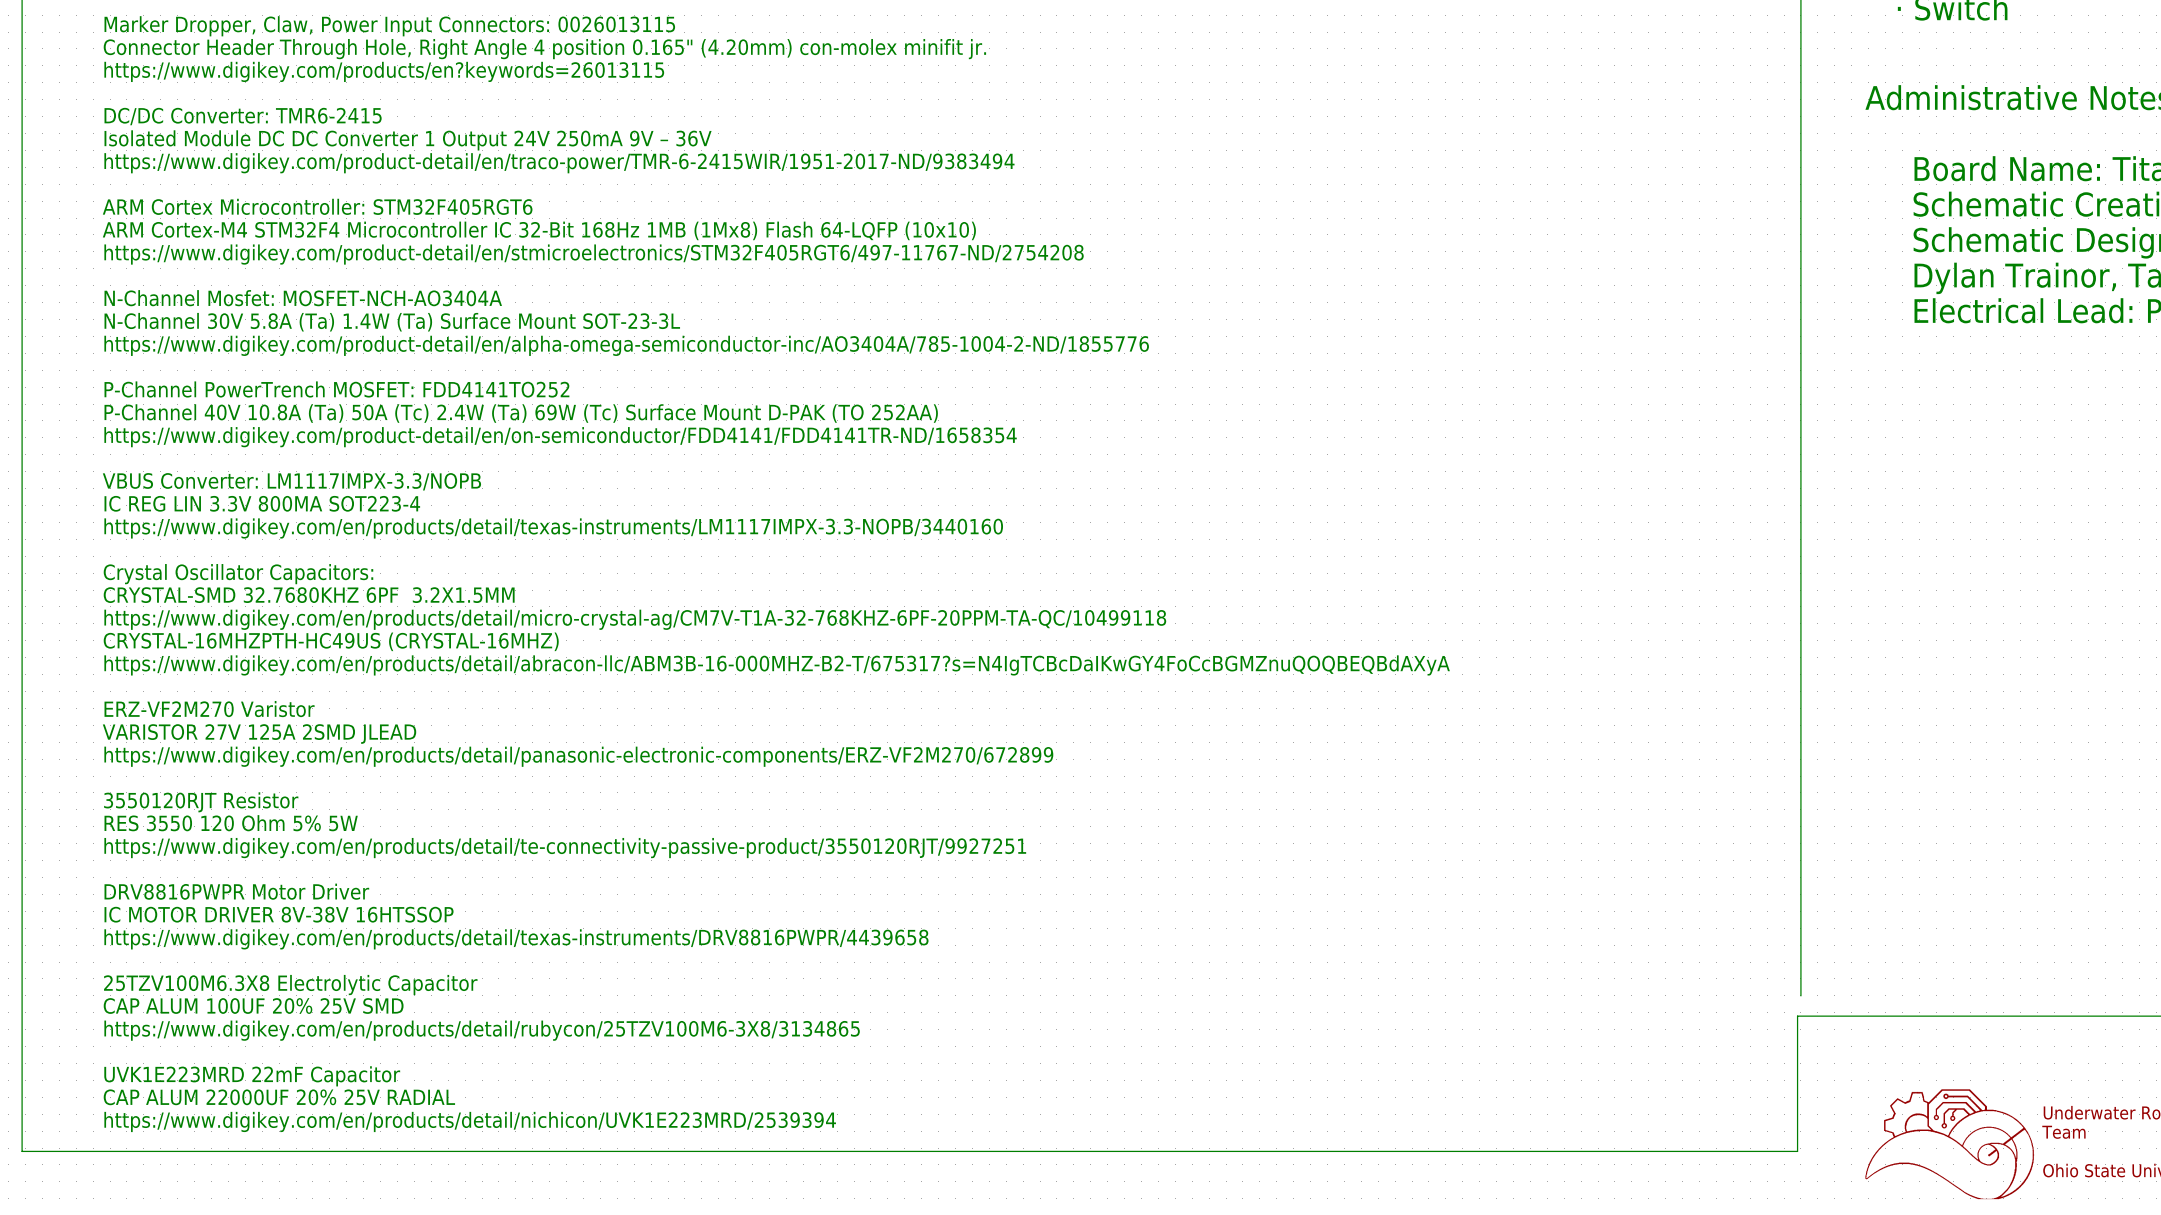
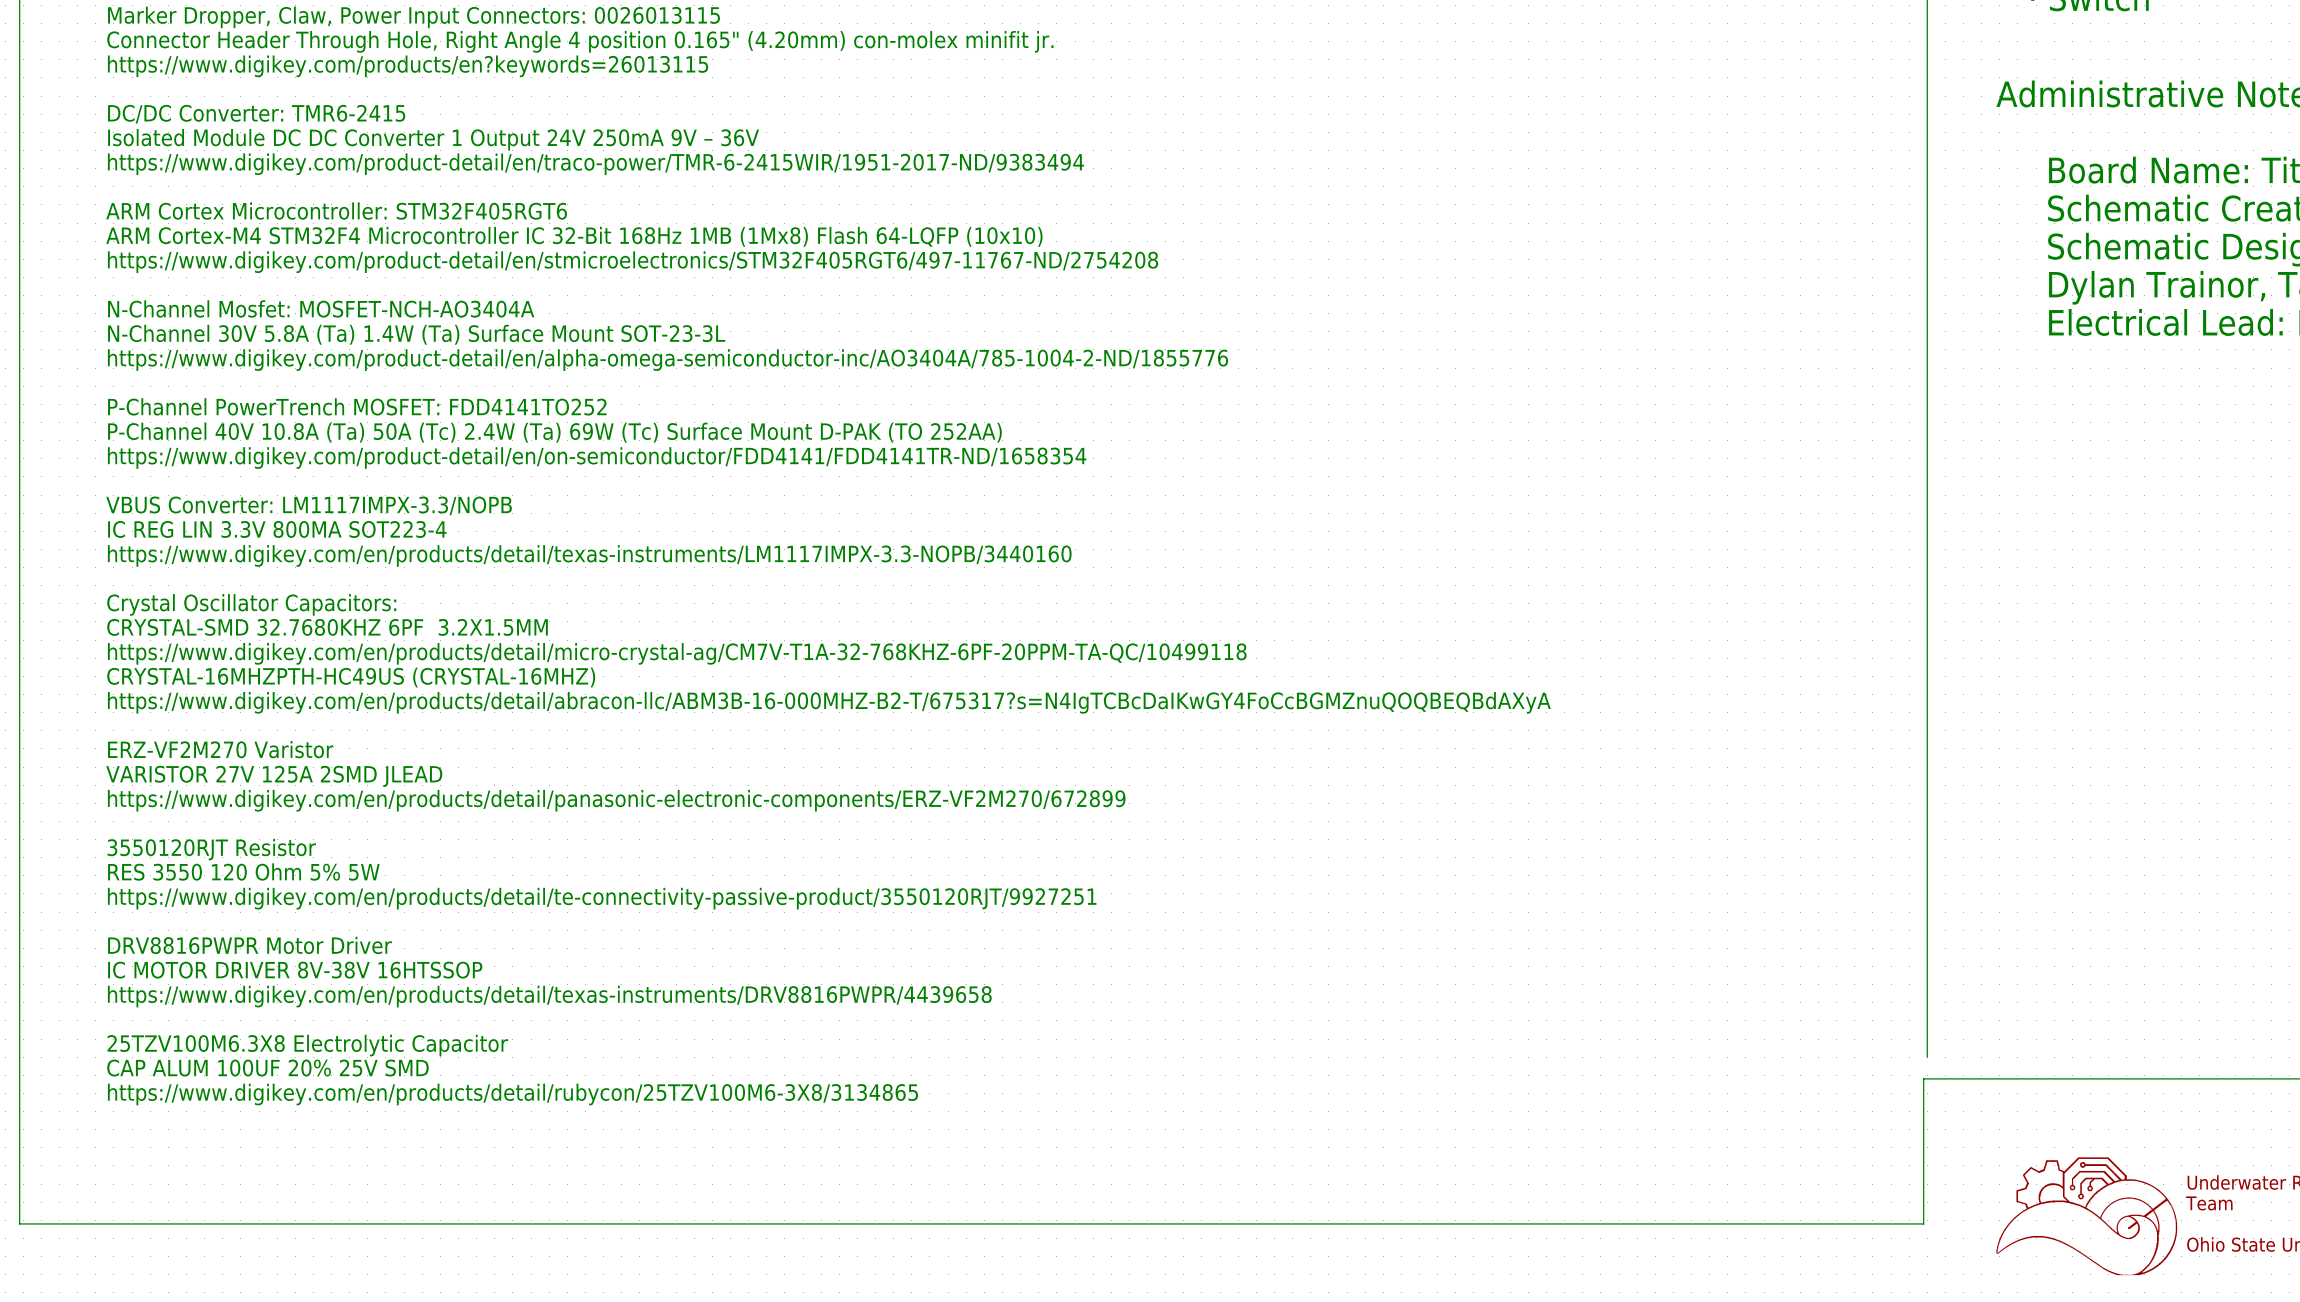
text: UVK1E223MRD 22mF Capacitor (252, 1076) -> none
text: CAP ALUM 22000UF 20% 25V RADIAL (279, 1097) -> none
text: https://www.digikey.com/en/products/detail/nichicon/UVK1E223MRD/2539394 (470, 1121) -> none

